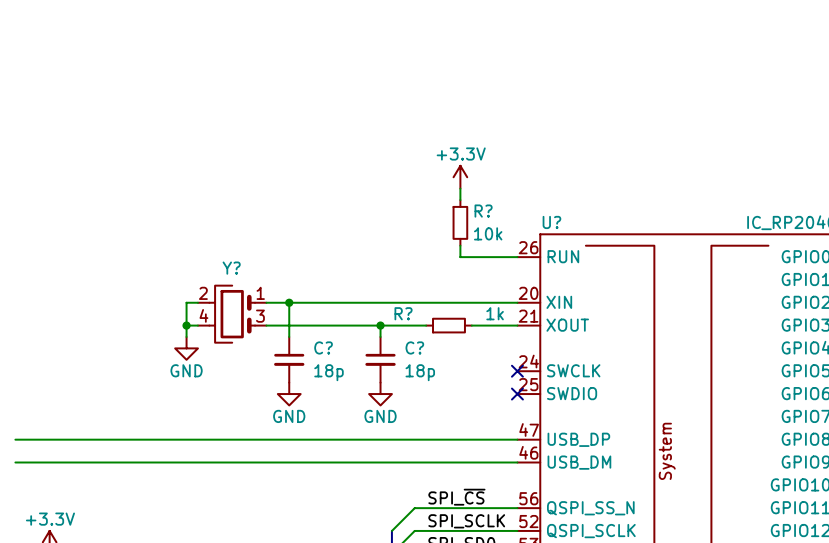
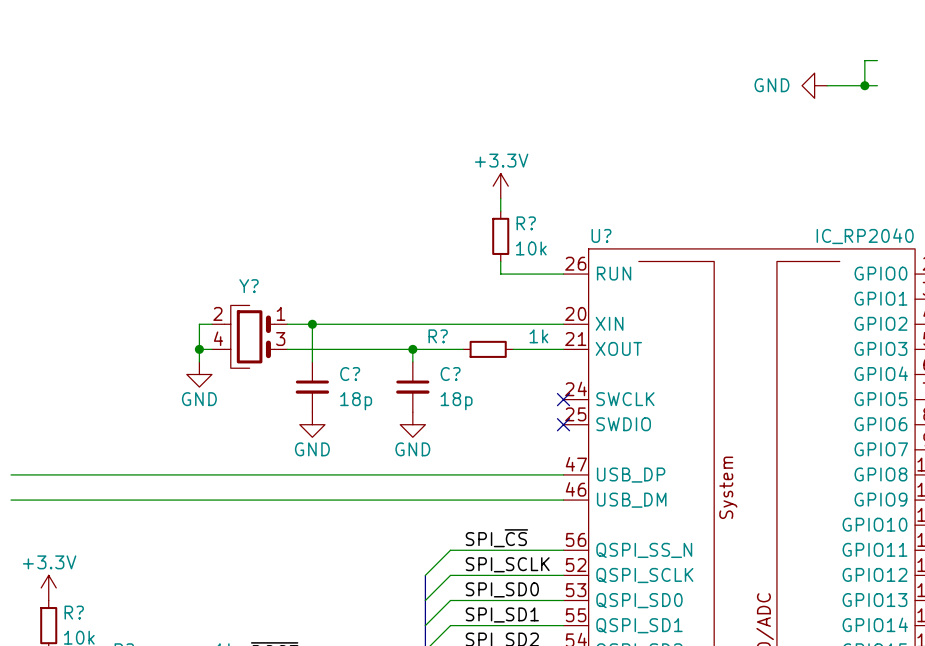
wire: none -> (877, 60) (864, 60) (864, 85)
power symbol: none -> GND (814, 85)
wire: none -> (827, 85) (877, 85)
junction: none -> (864, 85)

